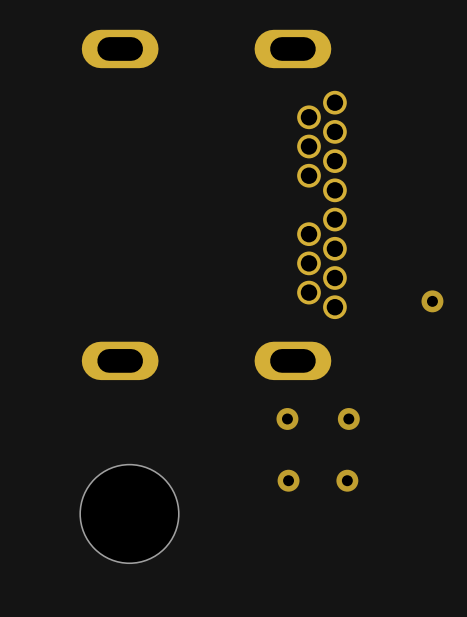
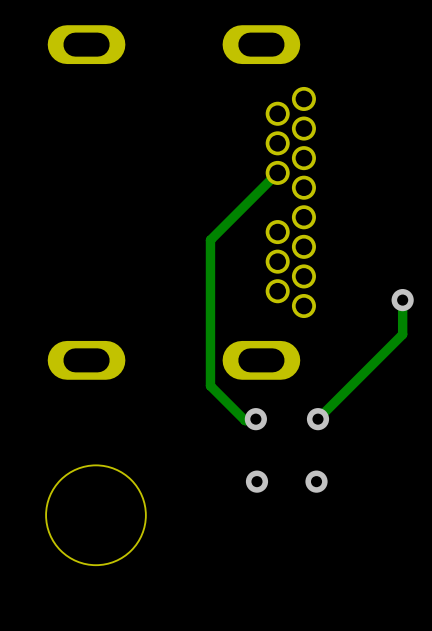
track: none -> (277, 172) (210, 240) (210, 385) (245, 420) (255, 419)
track: none -> (402, 300) (402, 334) (317, 419)

